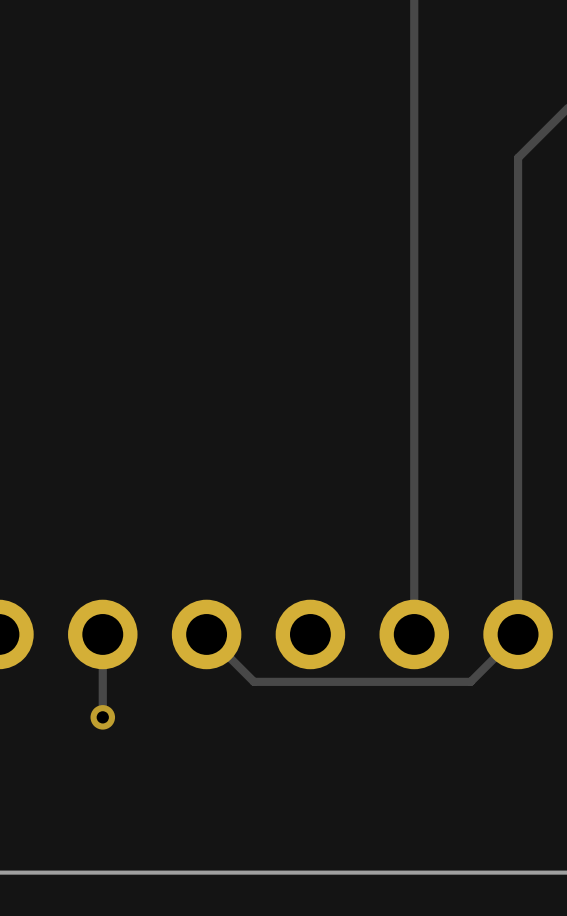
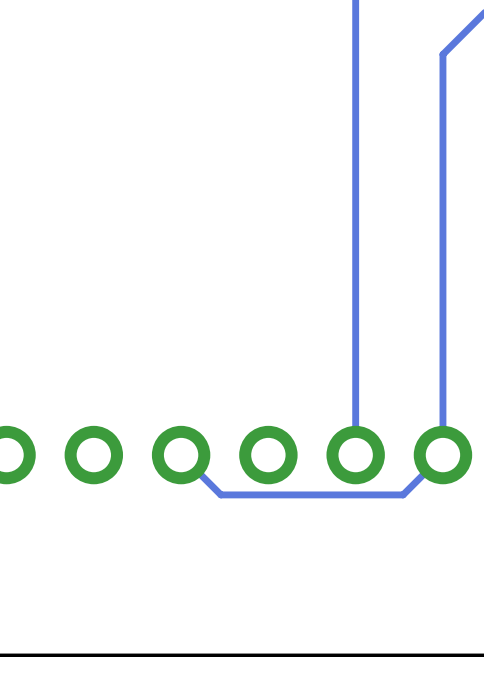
track: (102, 634) (102, 717) -> none
via: (102, 717) -> none

